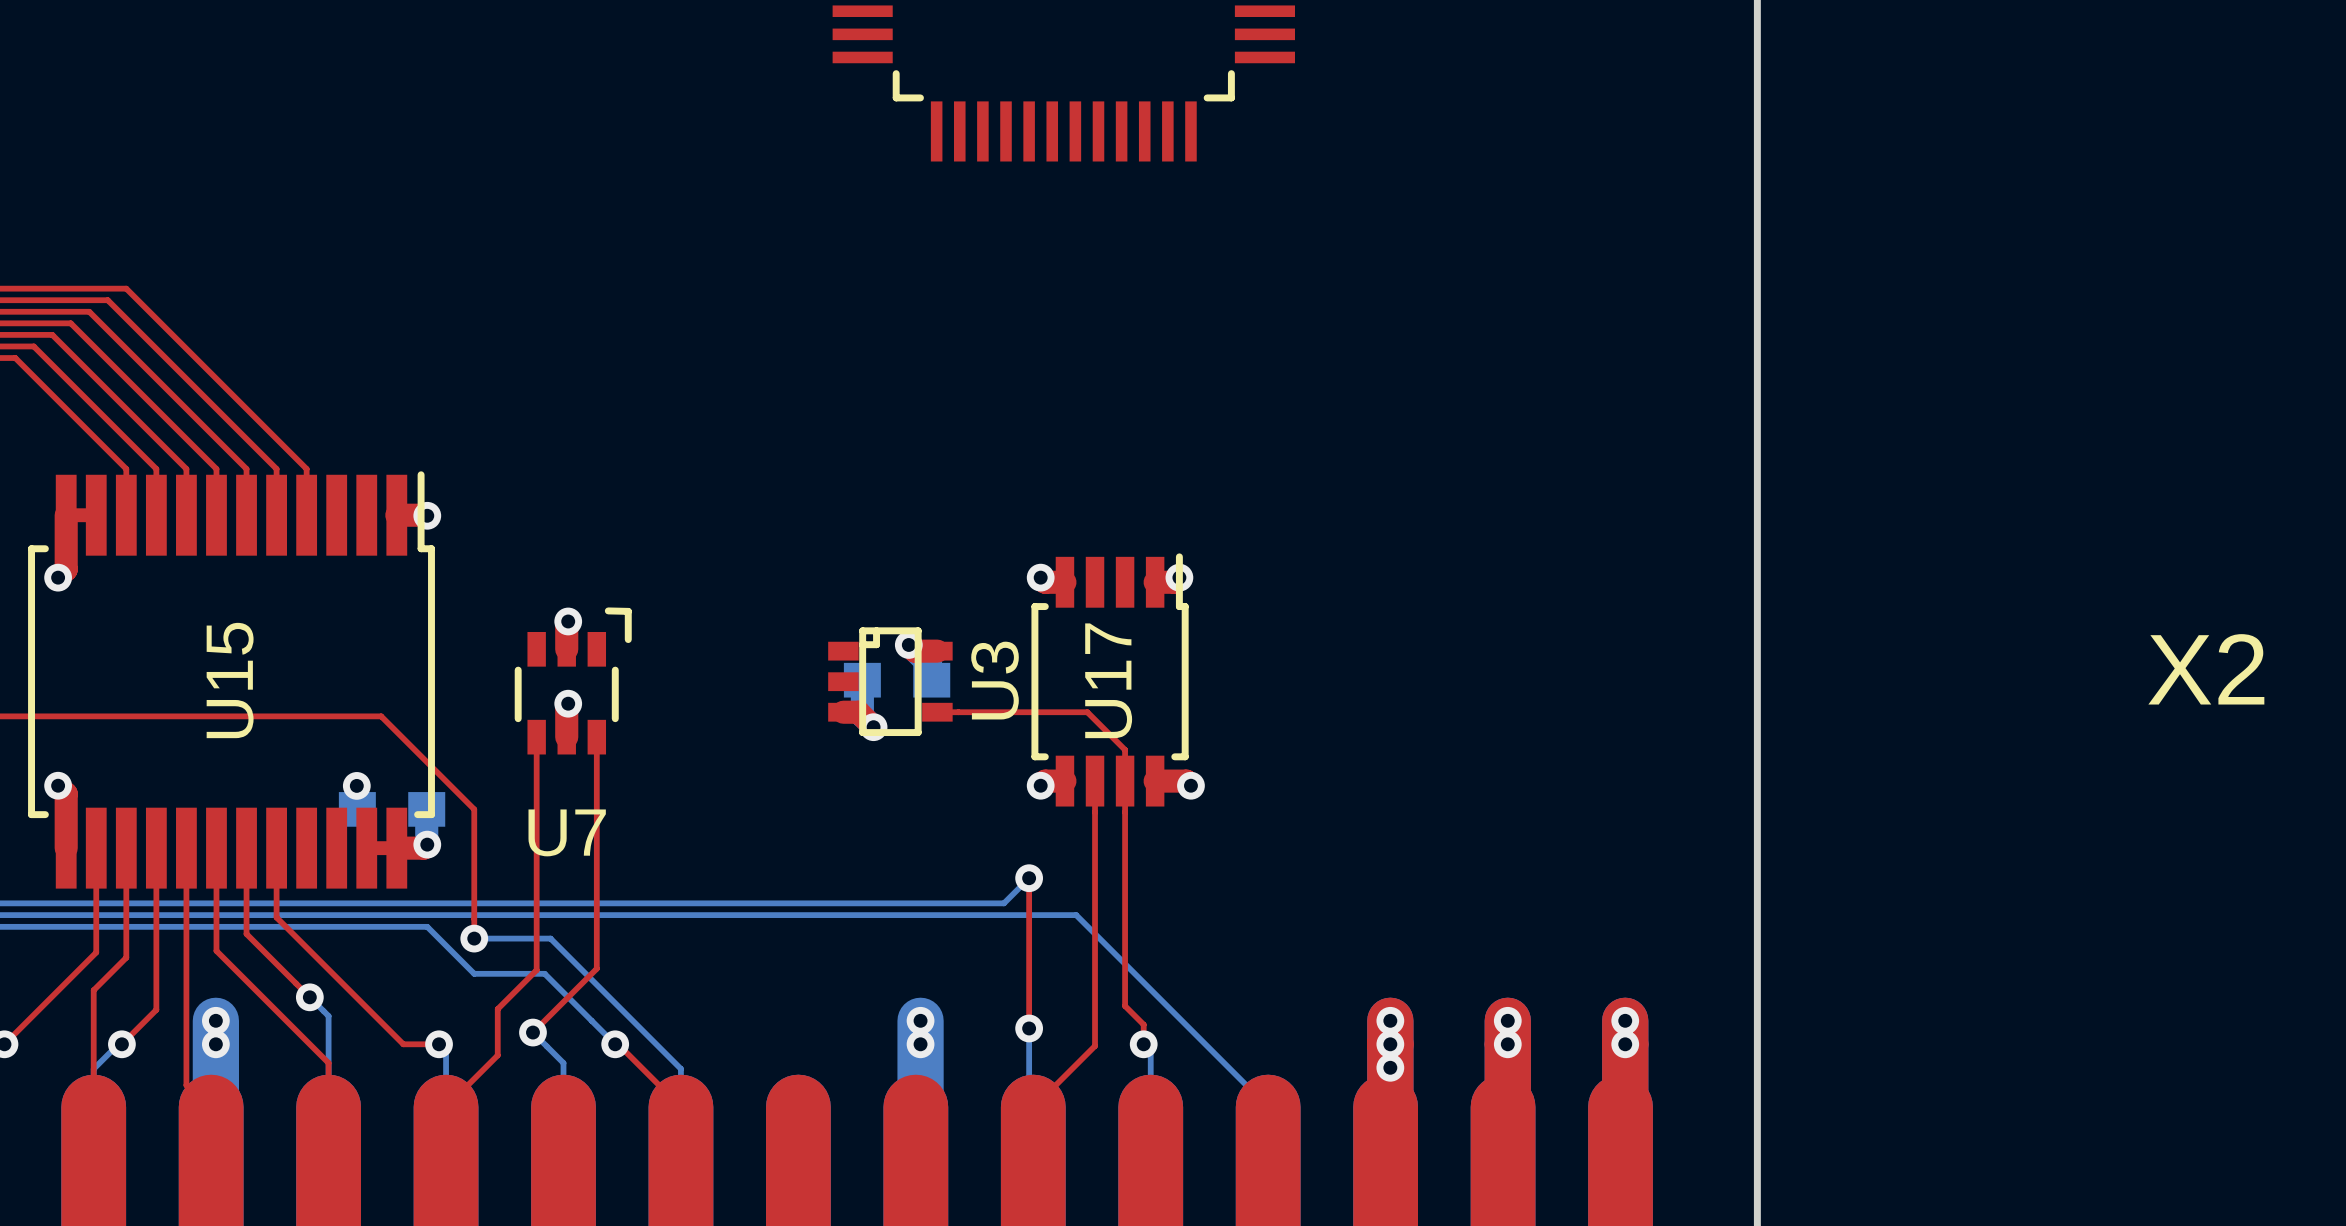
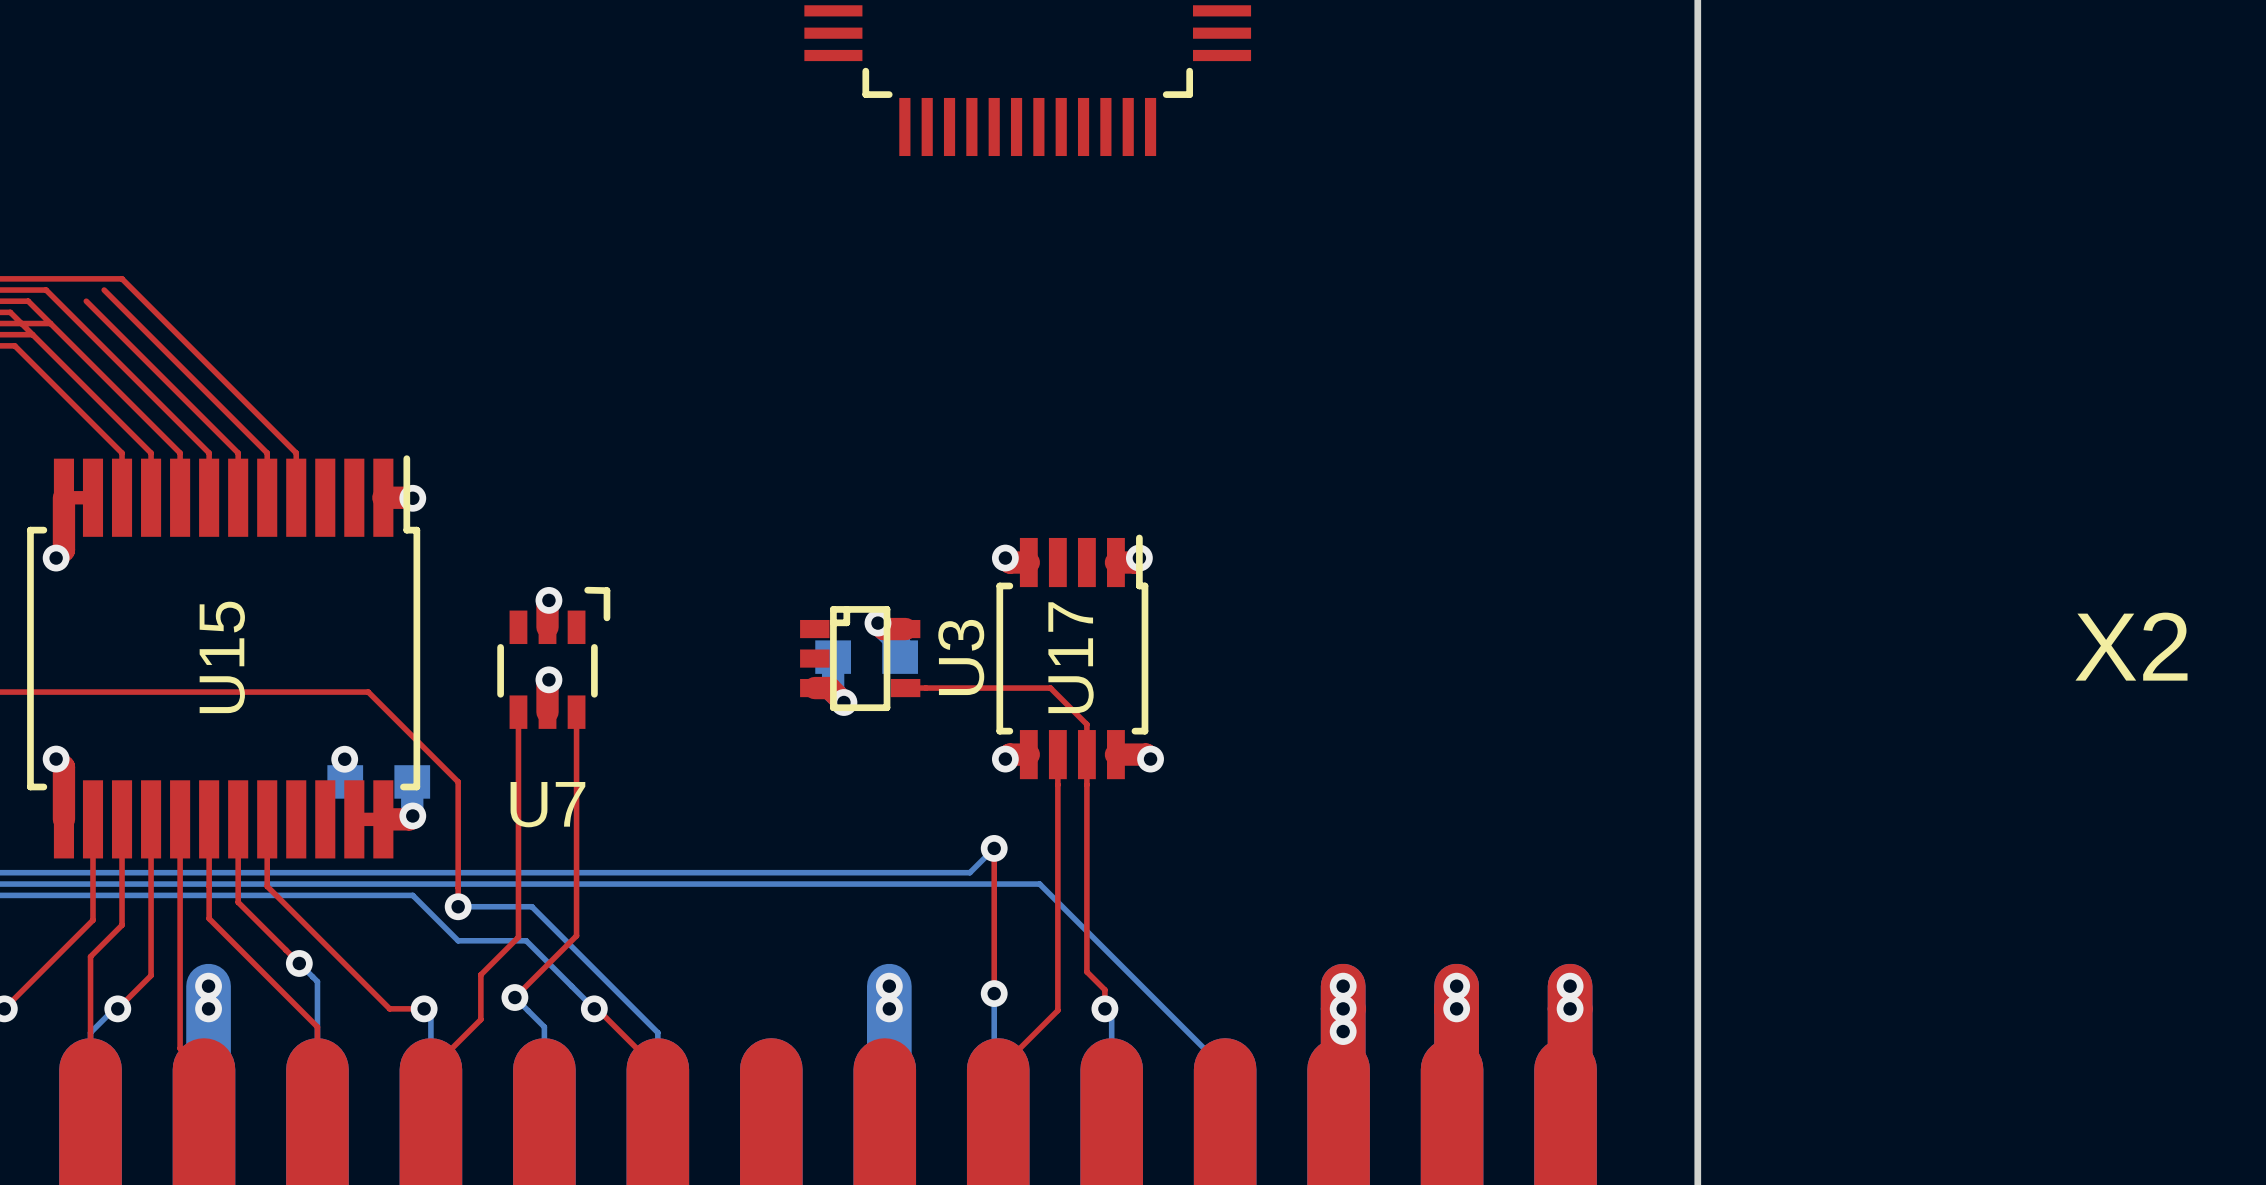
top track: (47, 300) (107, 300) -> (46, 290) (68, 312)
top track: (29, 311) (89, 311) -> (28, 301) (50, 323)
top track: (10, 323) (70, 323) -> (10, 312) (32, 334)

